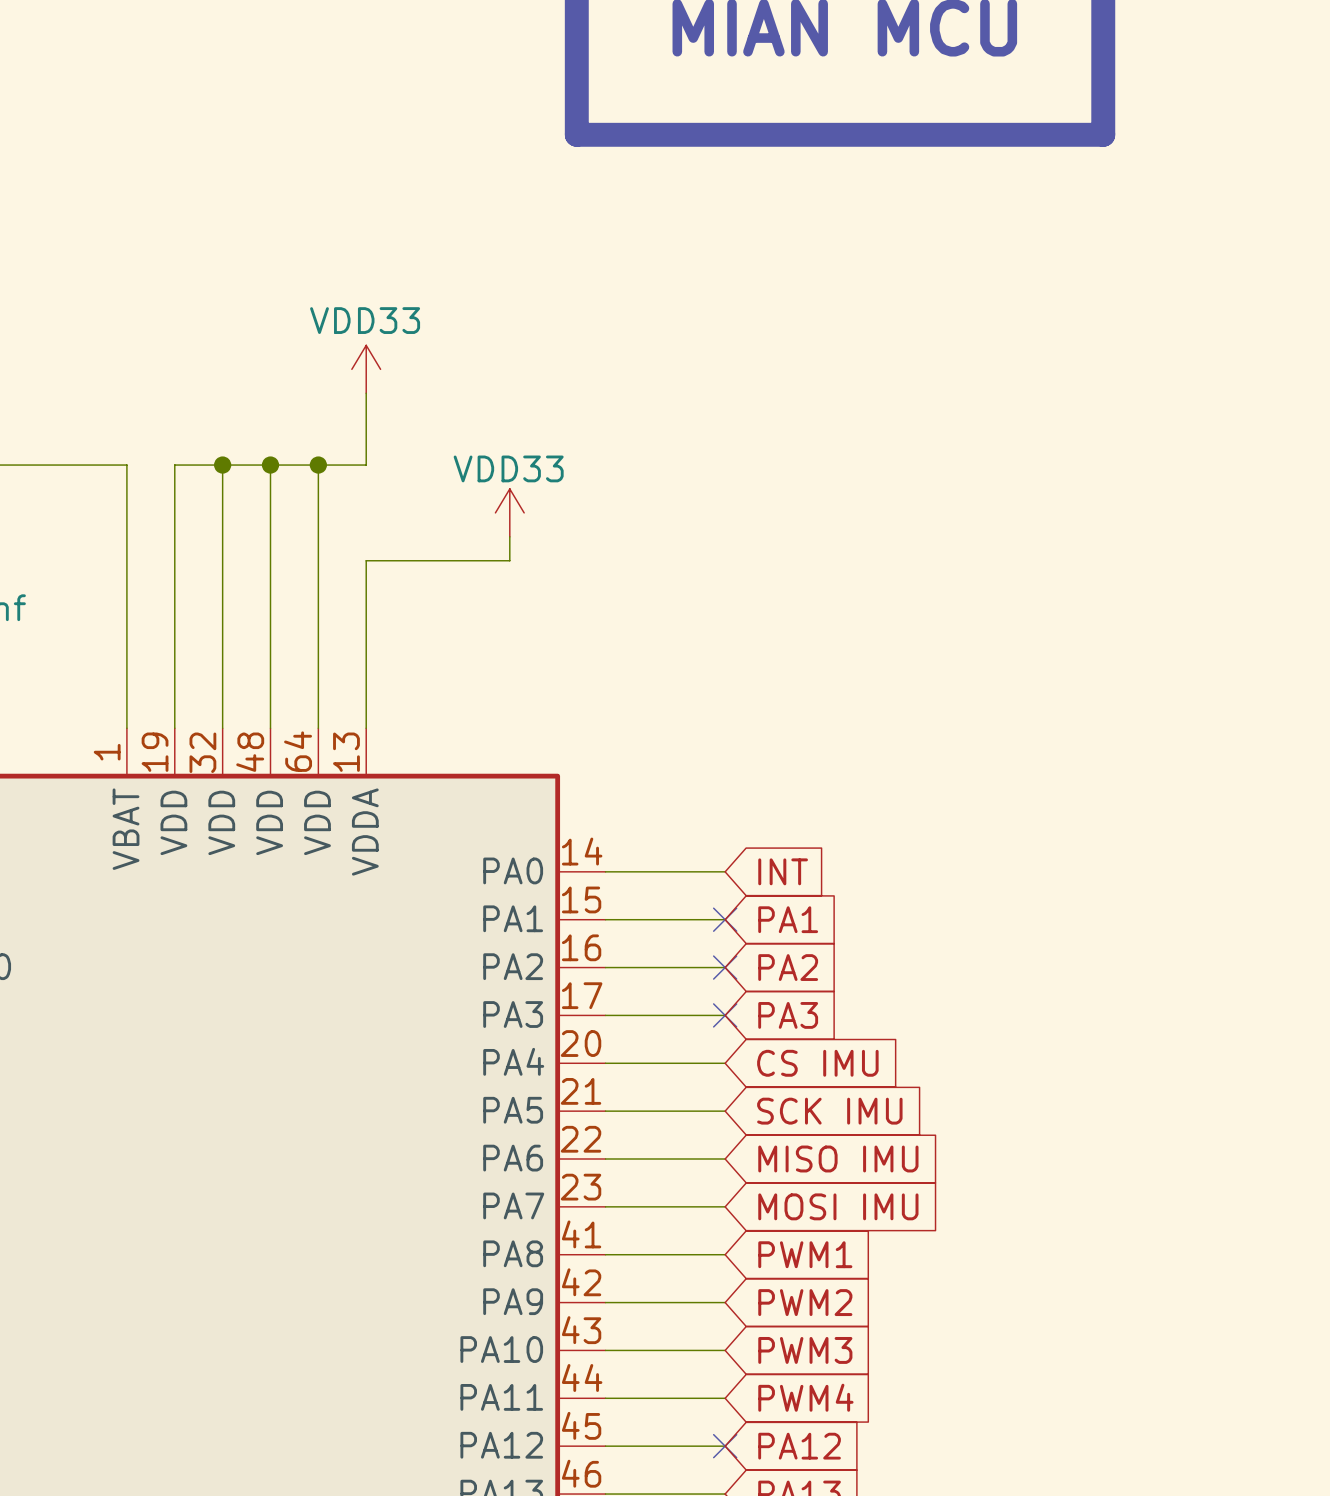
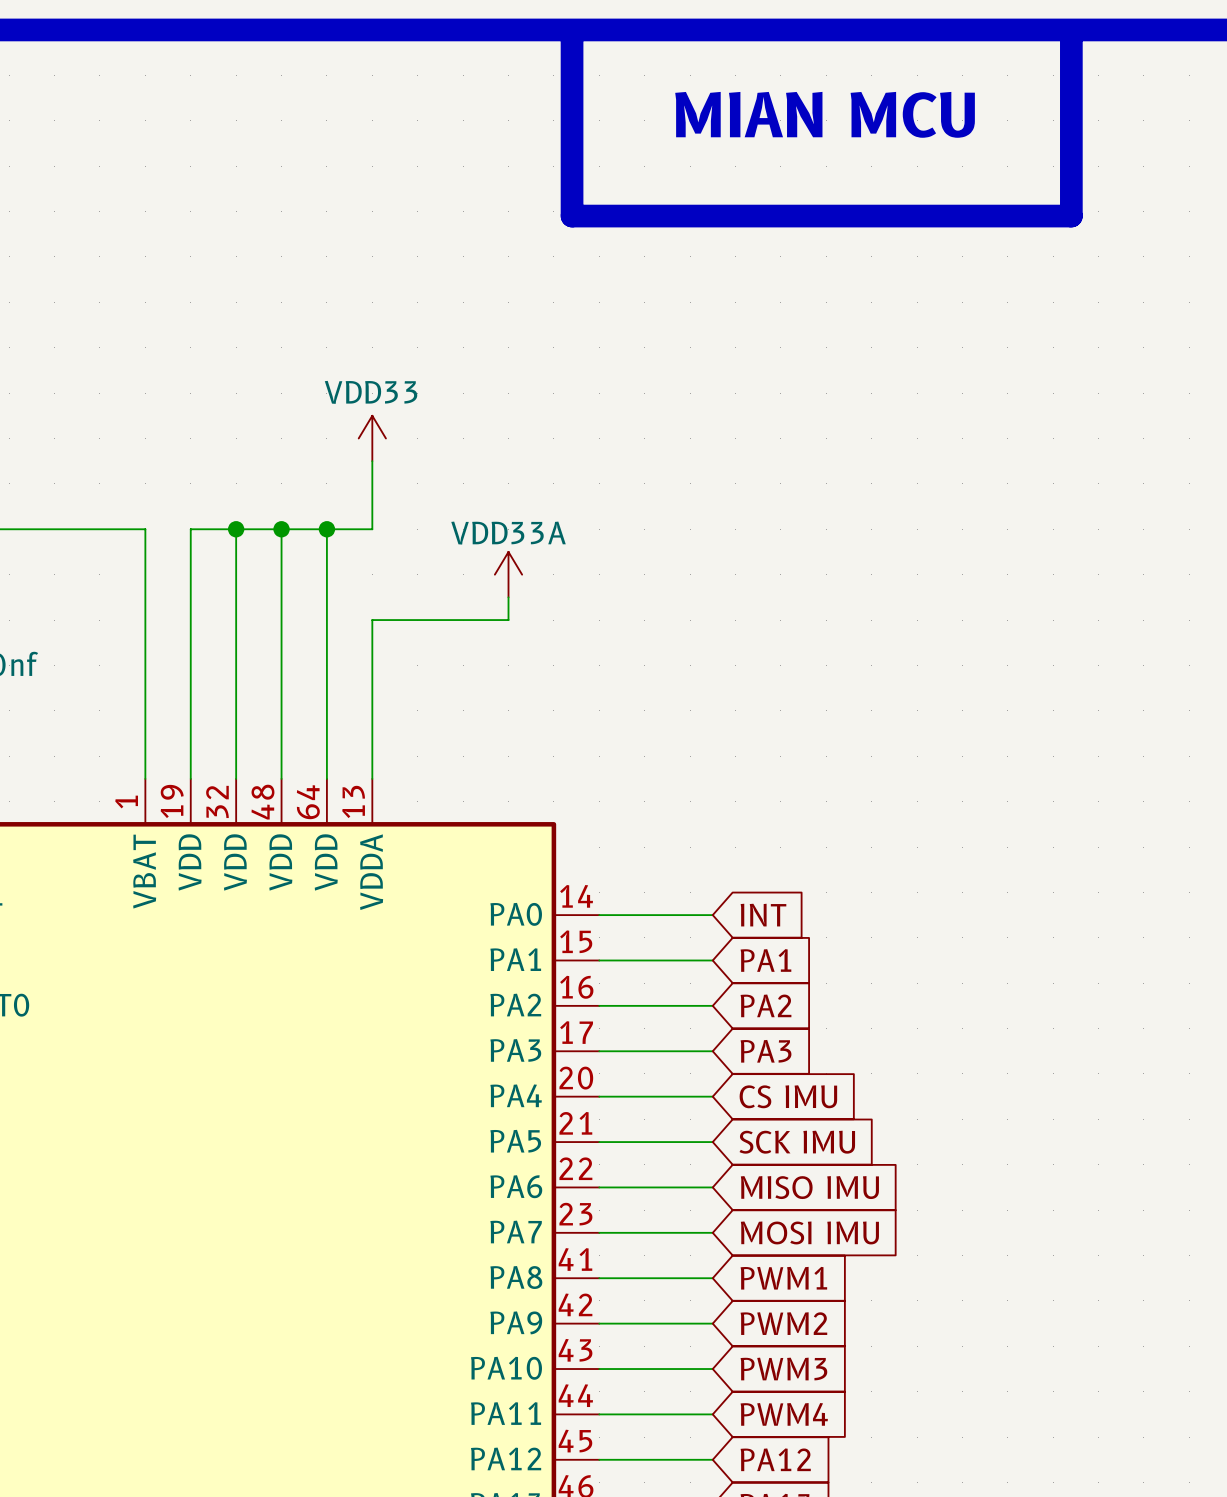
power symbol: VDD33 (509, 512) -> VDD33A (508, 574)
no-connect mark: (725, 919) -> none
no-connect mark: (725, 967) -> none
no-connect mark: (725, 1015) -> none
no-connect mark: (725, 1446) -> none

